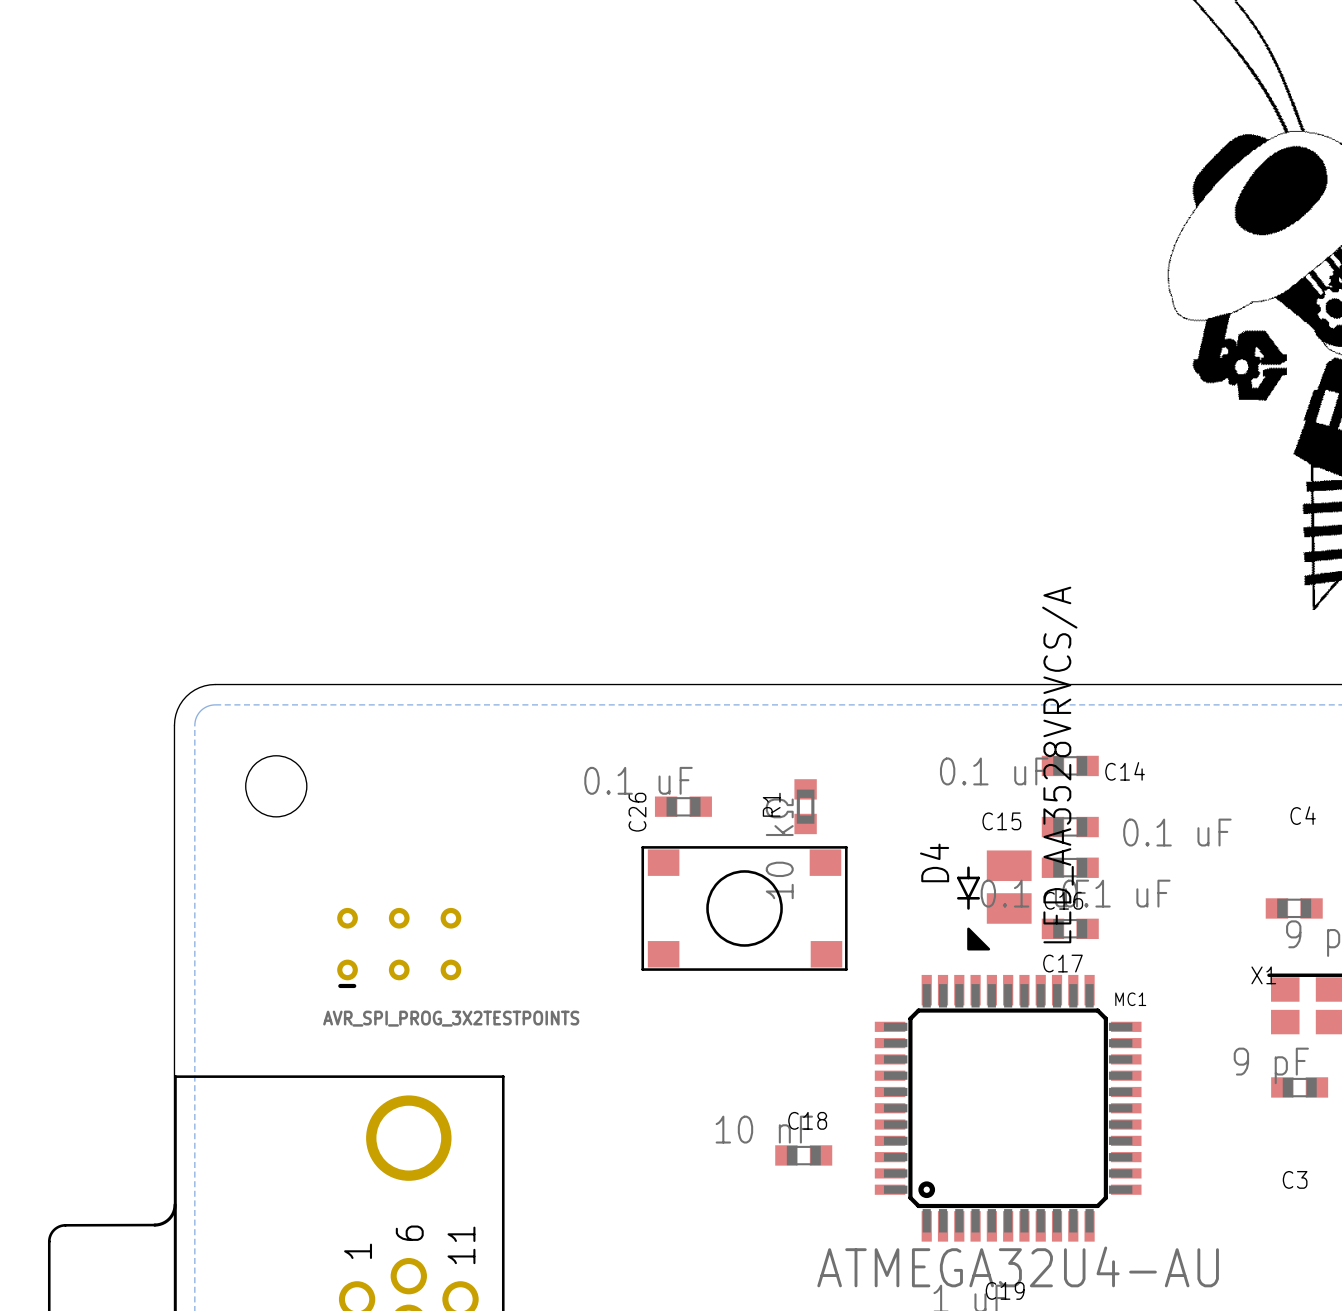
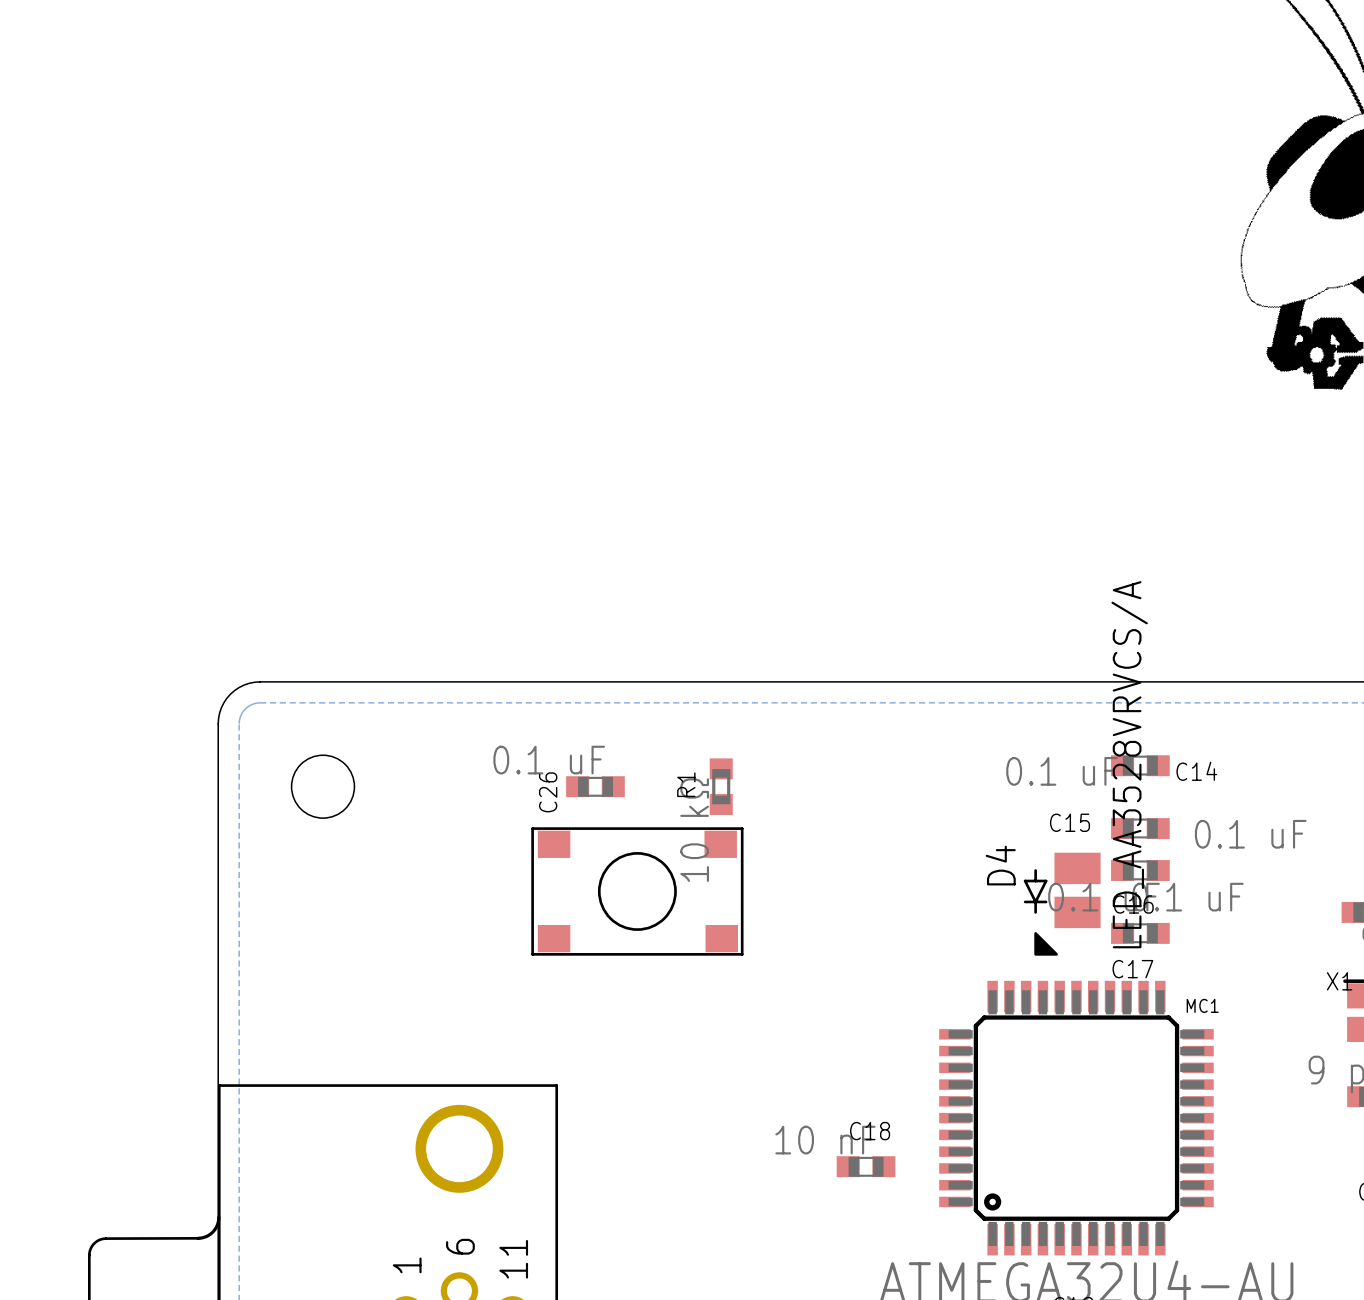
C26 position: (683, 806) -> (595, 786)
R1 position: (805, 806) -> (721, 786)
part position: (744, 908) -> (637, 891)
part: AVR_SPI_PROG_3X2TESTPOINTS (399, 947) -> none

